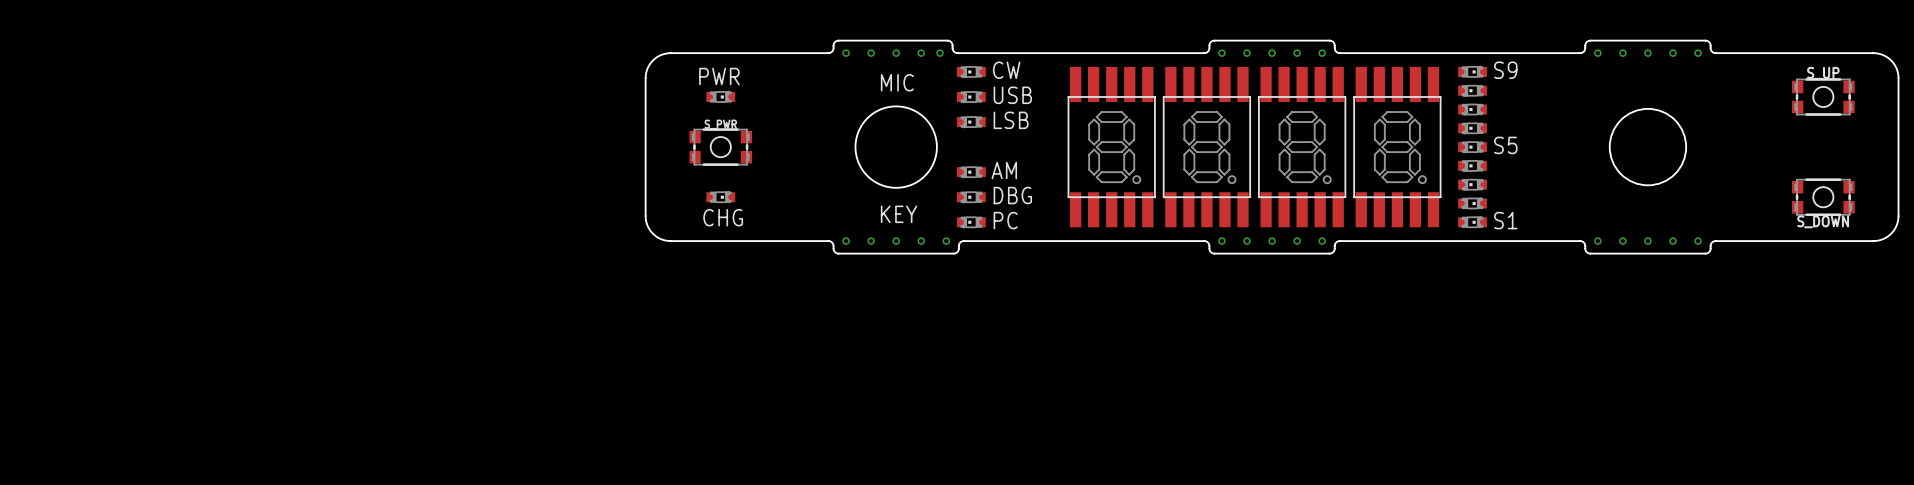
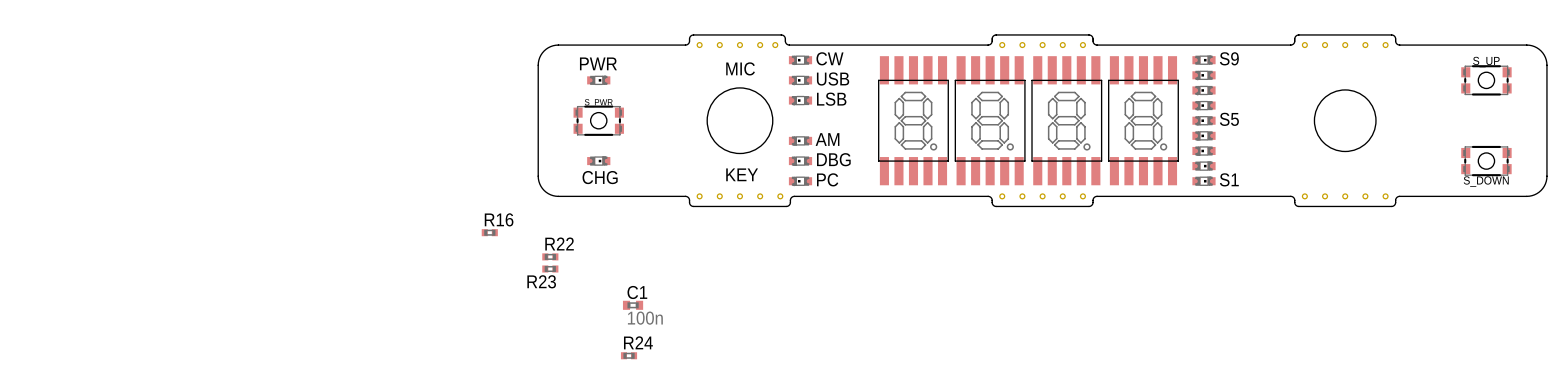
R16: none -> (489, 232)
R22: none -> (550, 256)
R23: none -> (550, 269)
C1: none -> 100n (633, 305)
R24: none -> (629, 355)

